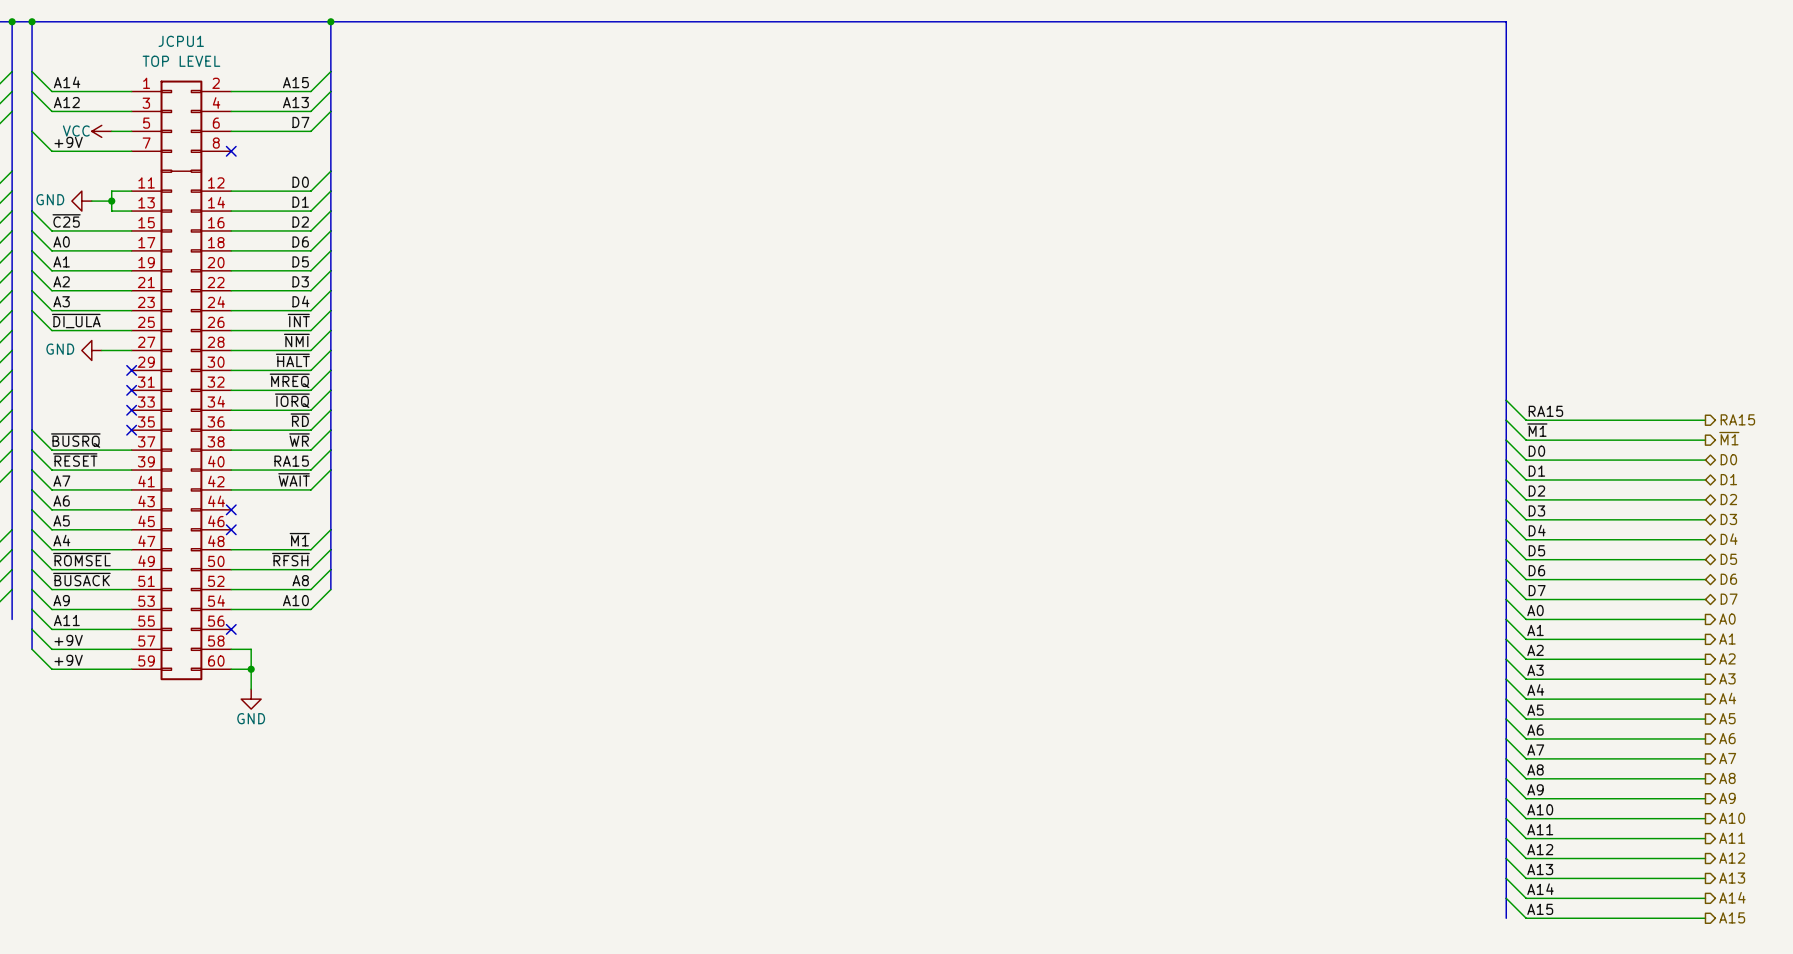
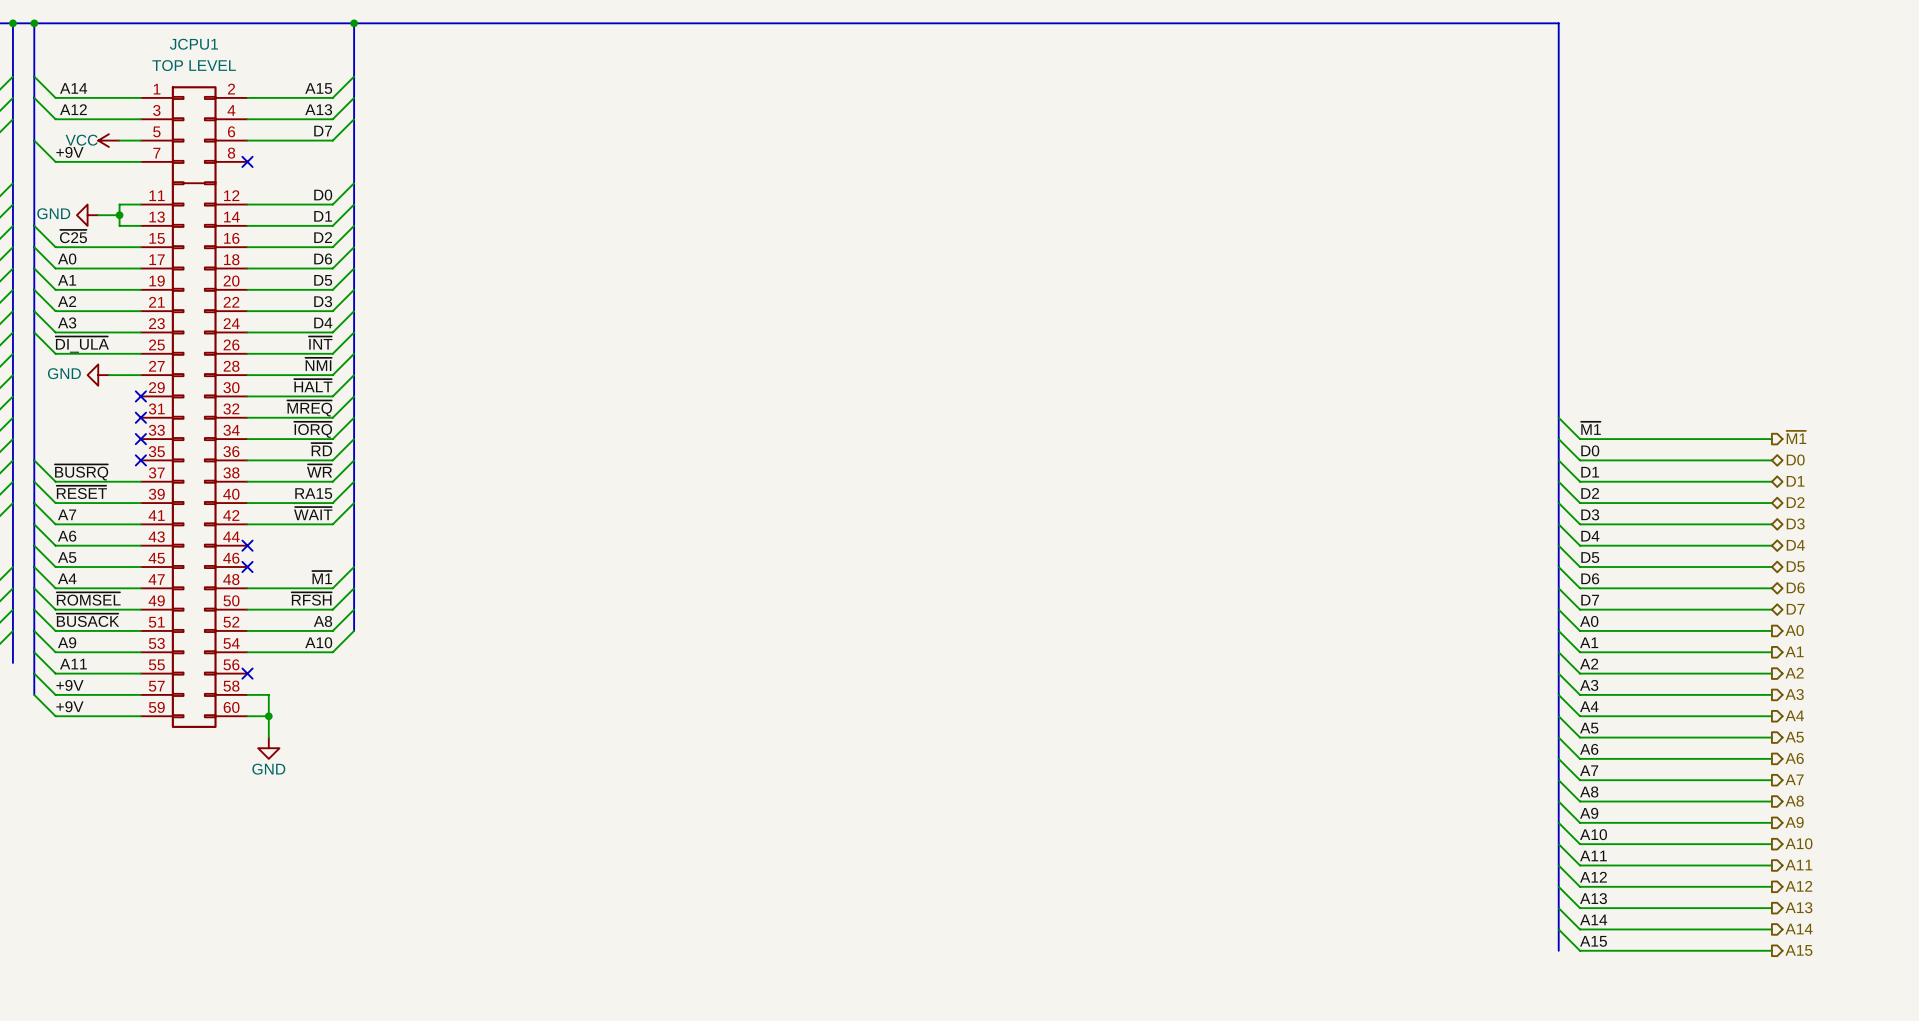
bus: (1456, 21) (1506, 21) (1506, 918) -> (1558, 23) (1558, 950)
wire: (1506, 400) (1526, 420) (1705, 420) -> (1558, 417) (1580, 439) (1771, 439)
label: RA15 (1545, 411) -> none
hierarchical label: RA15 (1737, 419) -> none
wire: (1506, 420) (1526, 440) (1705, 440) -> (1558, 439) (1580, 460) (1771, 460)
label position: ~{M1} (1537, 430) -> ~{M1} (1590, 428)
hierarchical label position: ~{M1} (1729, 438) -> ~{M1} (1796, 437)
wire: (1506, 440) (1526, 460) (1705, 460) -> (1558, 460) (1580, 481) (1771, 481)
label position: D0 (1536, 451) -> D0 (1590, 450)
hierarchical label position: D0 (1728, 459) -> D0 (1795, 459)
wire: (1506, 460) (1526, 479) (1705, 479) -> (1558, 481) (1580, 503) (1771, 503)
label position: D1 (1536, 471) -> D1 (1590, 472)
wire: (1506, 479) (1526, 499) (1705, 499) -> (1558, 503) (1580, 524) (1771, 524)
hierarchical label position: D1 (1728, 479) -> D1 (1795, 481)
label position: D2 (1536, 491) -> D2 (1590, 493)
wire: (1506, 499) (1526, 519) (1705, 519) -> (1558, 524) (1580, 545) (1771, 545)
hierarchical label position: D2 (1728, 499) -> D2 (1795, 502)
label position: D3 (1536, 510) -> D3 (1590, 514)
wire: (1506, 519) (1526, 539) (1705, 539) -> (1558, 545) (1580, 567) (1771, 567)
hierarchical label position: D3 (1728, 519) -> D3 (1795, 523)
label position: D4 (1537, 530) -> D4 (1590, 536)
wire: (1506, 539) (1526, 559) (1705, 559) -> (1558, 567) (1580, 588) (1771, 588)
hierarchical label position: D4 (1729, 539) -> D4 (1795, 545)
label position: D5 (1536, 550) -> D5 (1590, 557)
wire: (1506, 559) (1526, 579) (1705, 579) -> (1558, 588) (1580, 609) (1771, 609)
hierarchical label position: D5 (1728, 559) -> D5 (1795, 566)
label position: D6 (1536, 570) -> D6 (1590, 578)
wire: (1506, 579) (1526, 599) (1705, 599) -> (1558, 609) (1580, 630) (1771, 630)
hierarchical label position: D6 (1728, 579) -> D6 (1795, 587)
label position: D7 (1537, 590) -> D7 (1590, 600)
wire: (1506, 599) (1526, 619) (1705, 619) -> (1558, 630) (1580, 652) (1771, 652)
hierarchical label position: D7 (1729, 599) -> D7 (1795, 609)
label position: A0 (1535, 610) -> A0 (1589, 621)
wire: (1506, 619) (1526, 639) (1705, 639) -> (1558, 652) (1580, 673) (1771, 673)
hierarchical label position: A0 (1727, 619) -> A0 (1794, 630)
label position: A1 (1535, 630) -> A1 (1589, 642)
hierarchical label position: A1 (1727, 638) -> A1 (1794, 651)
wire: (1506, 639) (1526, 659) (1705, 659) -> (1558, 673) (1580, 694) (1771, 694)
label position: A2 (1535, 650) -> A2 (1589, 664)
hierarchical label position: A2 (1727, 658) -> A2 (1794, 673)
wire: (1506, 659) (1526, 679) (1705, 679) -> (1558, 694) (1580, 716) (1771, 716)
label position: A3 (1535, 670) -> A3 (1589, 685)
hierarchical label position: A3 (1727, 678) -> A3 (1794, 694)
wire: (1506, 679) (1526, 699) (1705, 699) -> (1558, 716) (1580, 737) (1771, 737)
label position: A4 (1535, 690) -> A4 (1589, 706)
hierarchical label position: A4 (1727, 698) -> A4 (1794, 715)
wire: (1506, 699) (1526, 719) (1705, 719) -> (1558, 737) (1580, 758) (1771, 758)
label position: A5 (1535, 710) -> A5 (1589, 728)
hierarchical label position: A5 (1727, 718) -> A5 (1794, 737)
wire: (1506, 719) (1526, 738) (1705, 738) -> (1558, 758) (1580, 780) (1771, 780)
label position: A6 (1535, 730) -> A6 (1589, 749)
wire: (1506, 738) (1526, 758) (1705, 758) -> (1558, 780) (1580, 801) (1771, 801)
hierarchical label position: A6 (1727, 738) -> A6 (1794, 758)
label position: A7 (1535, 750) -> A7 (1589, 770)
wire: (1506, 758) (1526, 778) (1705, 778) -> (1558, 801) (1580, 822) (1771, 822)
hierarchical label position: A7 (1727, 758) -> A7 (1794, 779)
label position: A8 (1535, 769) -> A8 (1589, 792)
wire: (1506, 778) (1526, 798) (1705, 798) -> (1558, 822) (1580, 844) (1771, 844)
hierarchical label position: A8 (1727, 778) -> A8 (1794, 801)
label position: A9 (1535, 789) -> A9 (1589, 813)
wire: (1506, 798) (1526, 818) (1705, 818) -> (1558, 844) (1580, 865) (1771, 865)
hierarchical label position: A9 (1727, 798) -> A9 (1794, 822)
label position: A10 (1540, 809) -> A10 (1593, 834)
wire: (1506, 818) (1526, 838) (1705, 838) -> (1558, 865) (1580, 886) (1771, 886)
hierarchical label position: A10 (1732, 818) -> A10 (1798, 843)
label position: A11 (1540, 829) -> A11 (1593, 855)
wire: (1506, 838) (1526, 858) (1705, 858) -> (1558, 886) (1580, 908) (1771, 908)
hierarchical label position: A11 (1732, 838) -> A11 (1798, 865)
label position: A12 (1540, 849) -> A12 (1593, 877)
wire: (1506, 858) (1526, 878) (1705, 878) -> (1558, 908) (1580, 929) (1771, 929)
hierarchical label position: A12 (1732, 858) -> A12 (1798, 886)
label position: A13 (1540, 869) -> A13 (1593, 898)
wire: (1506, 878) (1526, 898) (1705, 898) -> (1558, 929) (1580, 950) (1771, 950)
hierarchical label position: A13 (1732, 878) -> A13 (1798, 907)
label position: A14 (1540, 889) -> A14 (1593, 919)
hierarchical label position: A14 (1732, 897) -> A14 (1799, 929)
wire: (1506, 898) (1526, 918) (1705, 918) -> none
label position: A15 (1540, 909) -> A15 (1593, 941)
hierarchical label position: A15 (1732, 917) -> A15 (1798, 950)

